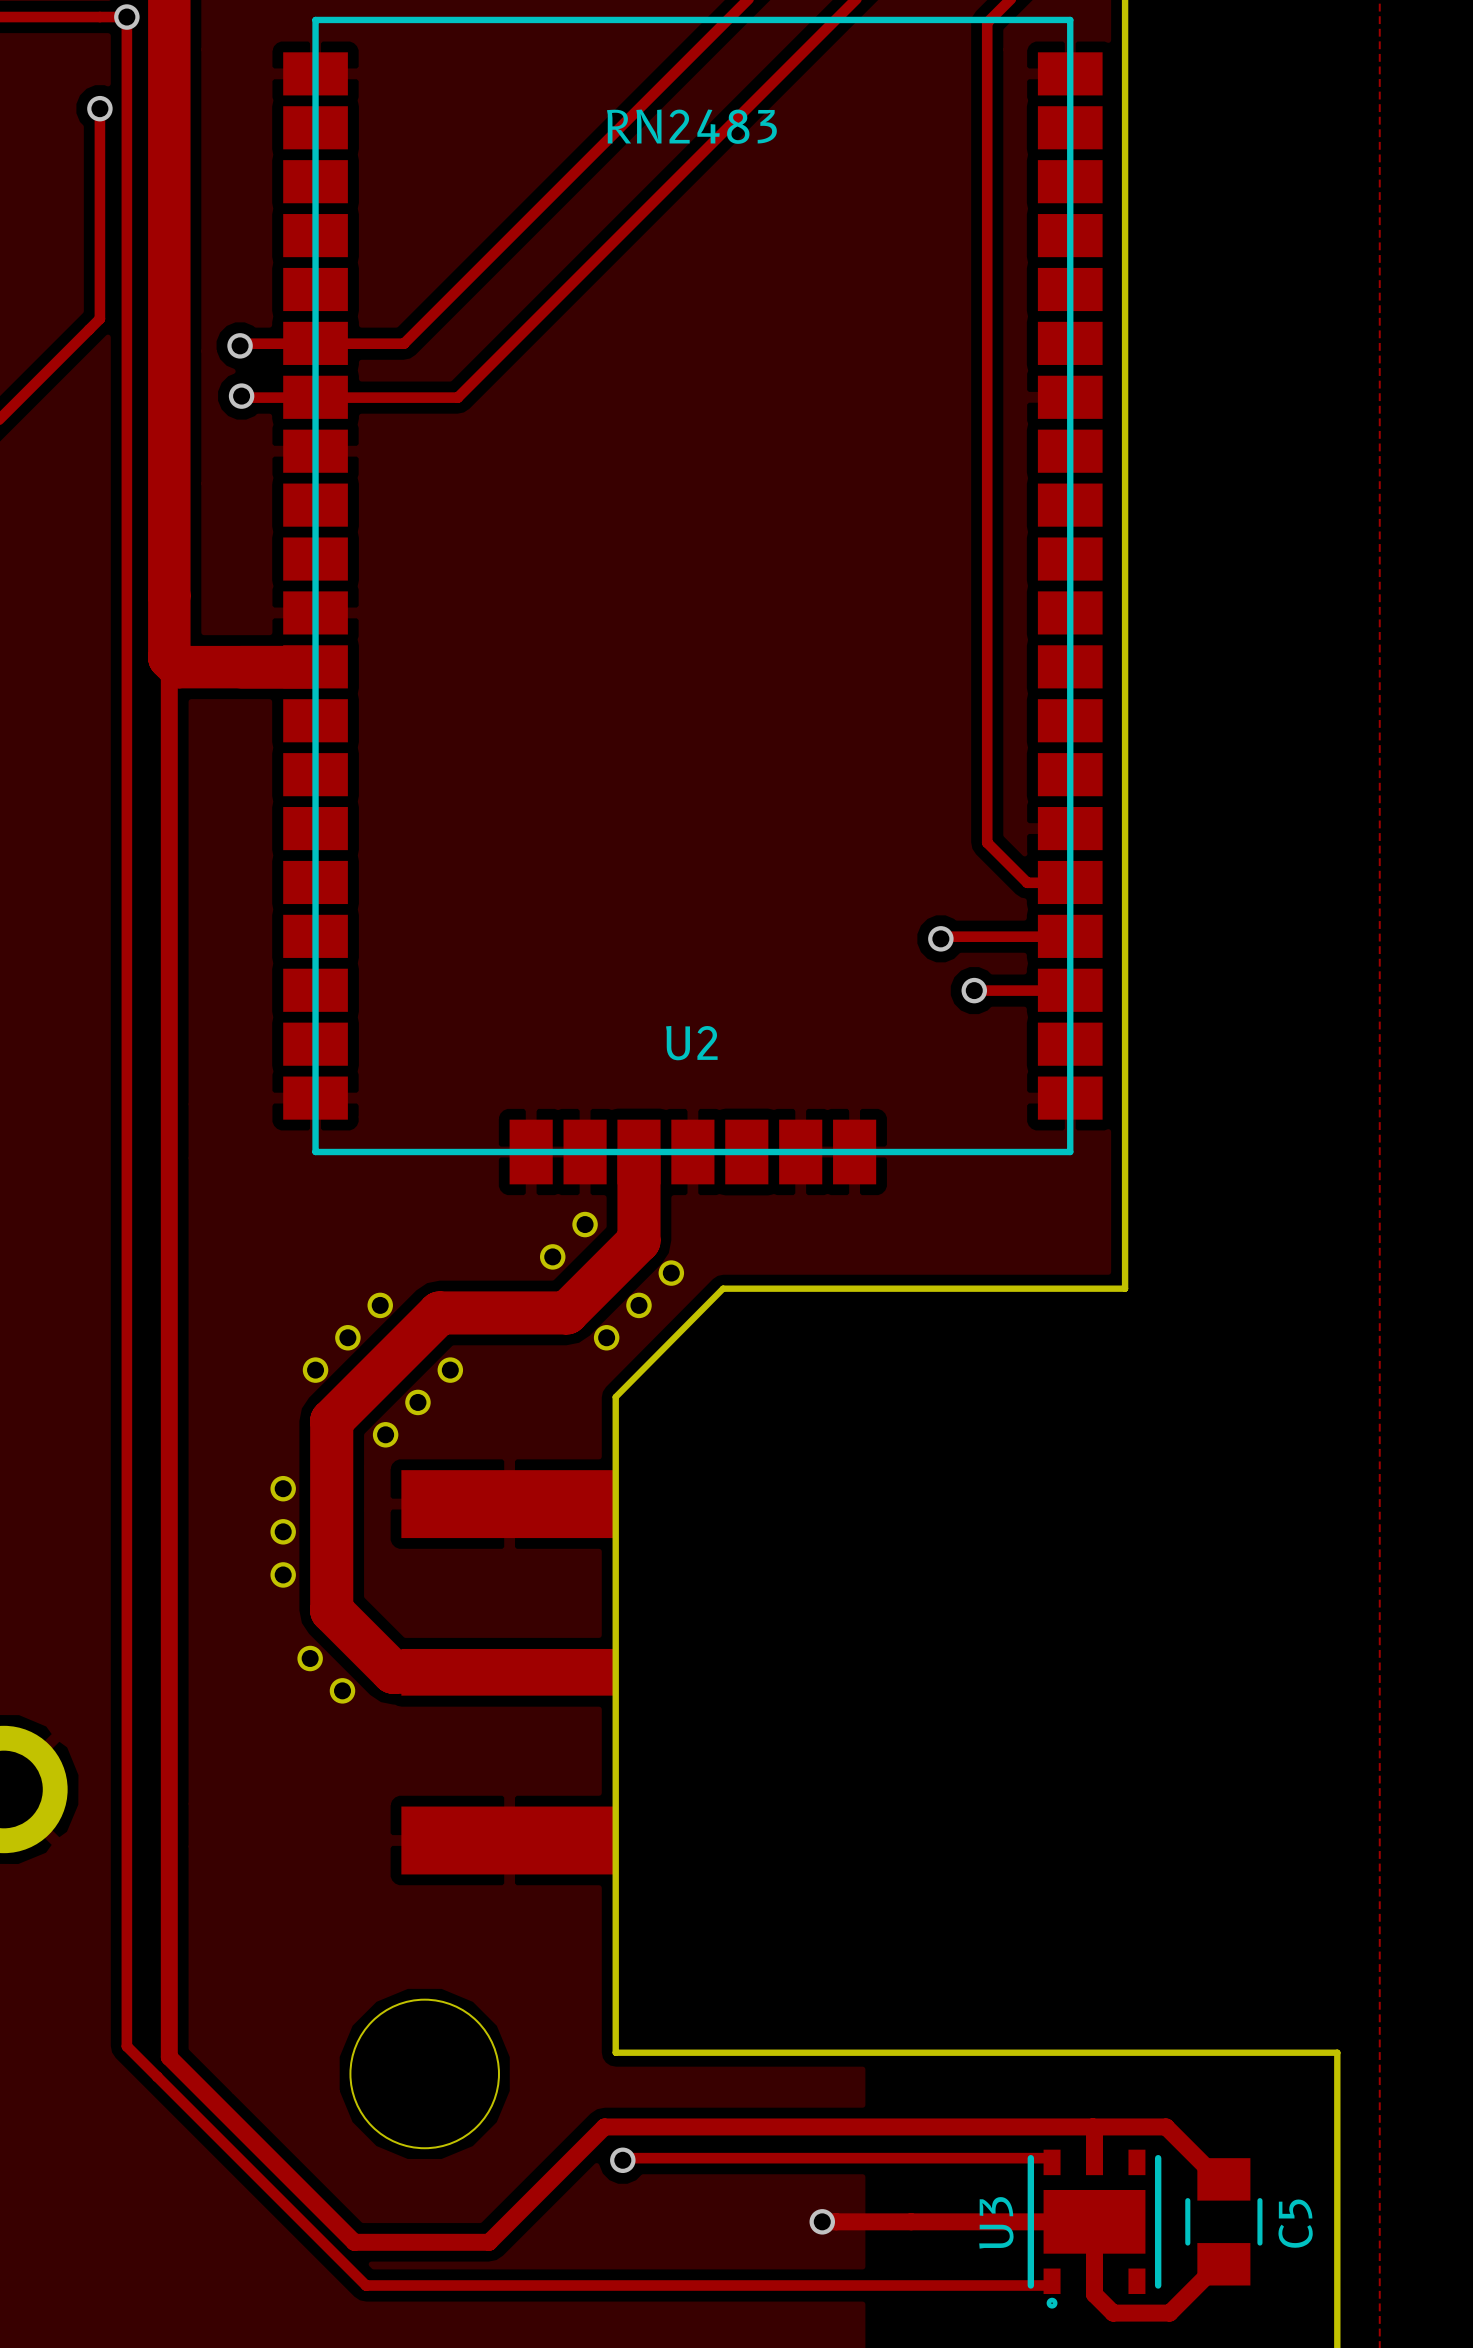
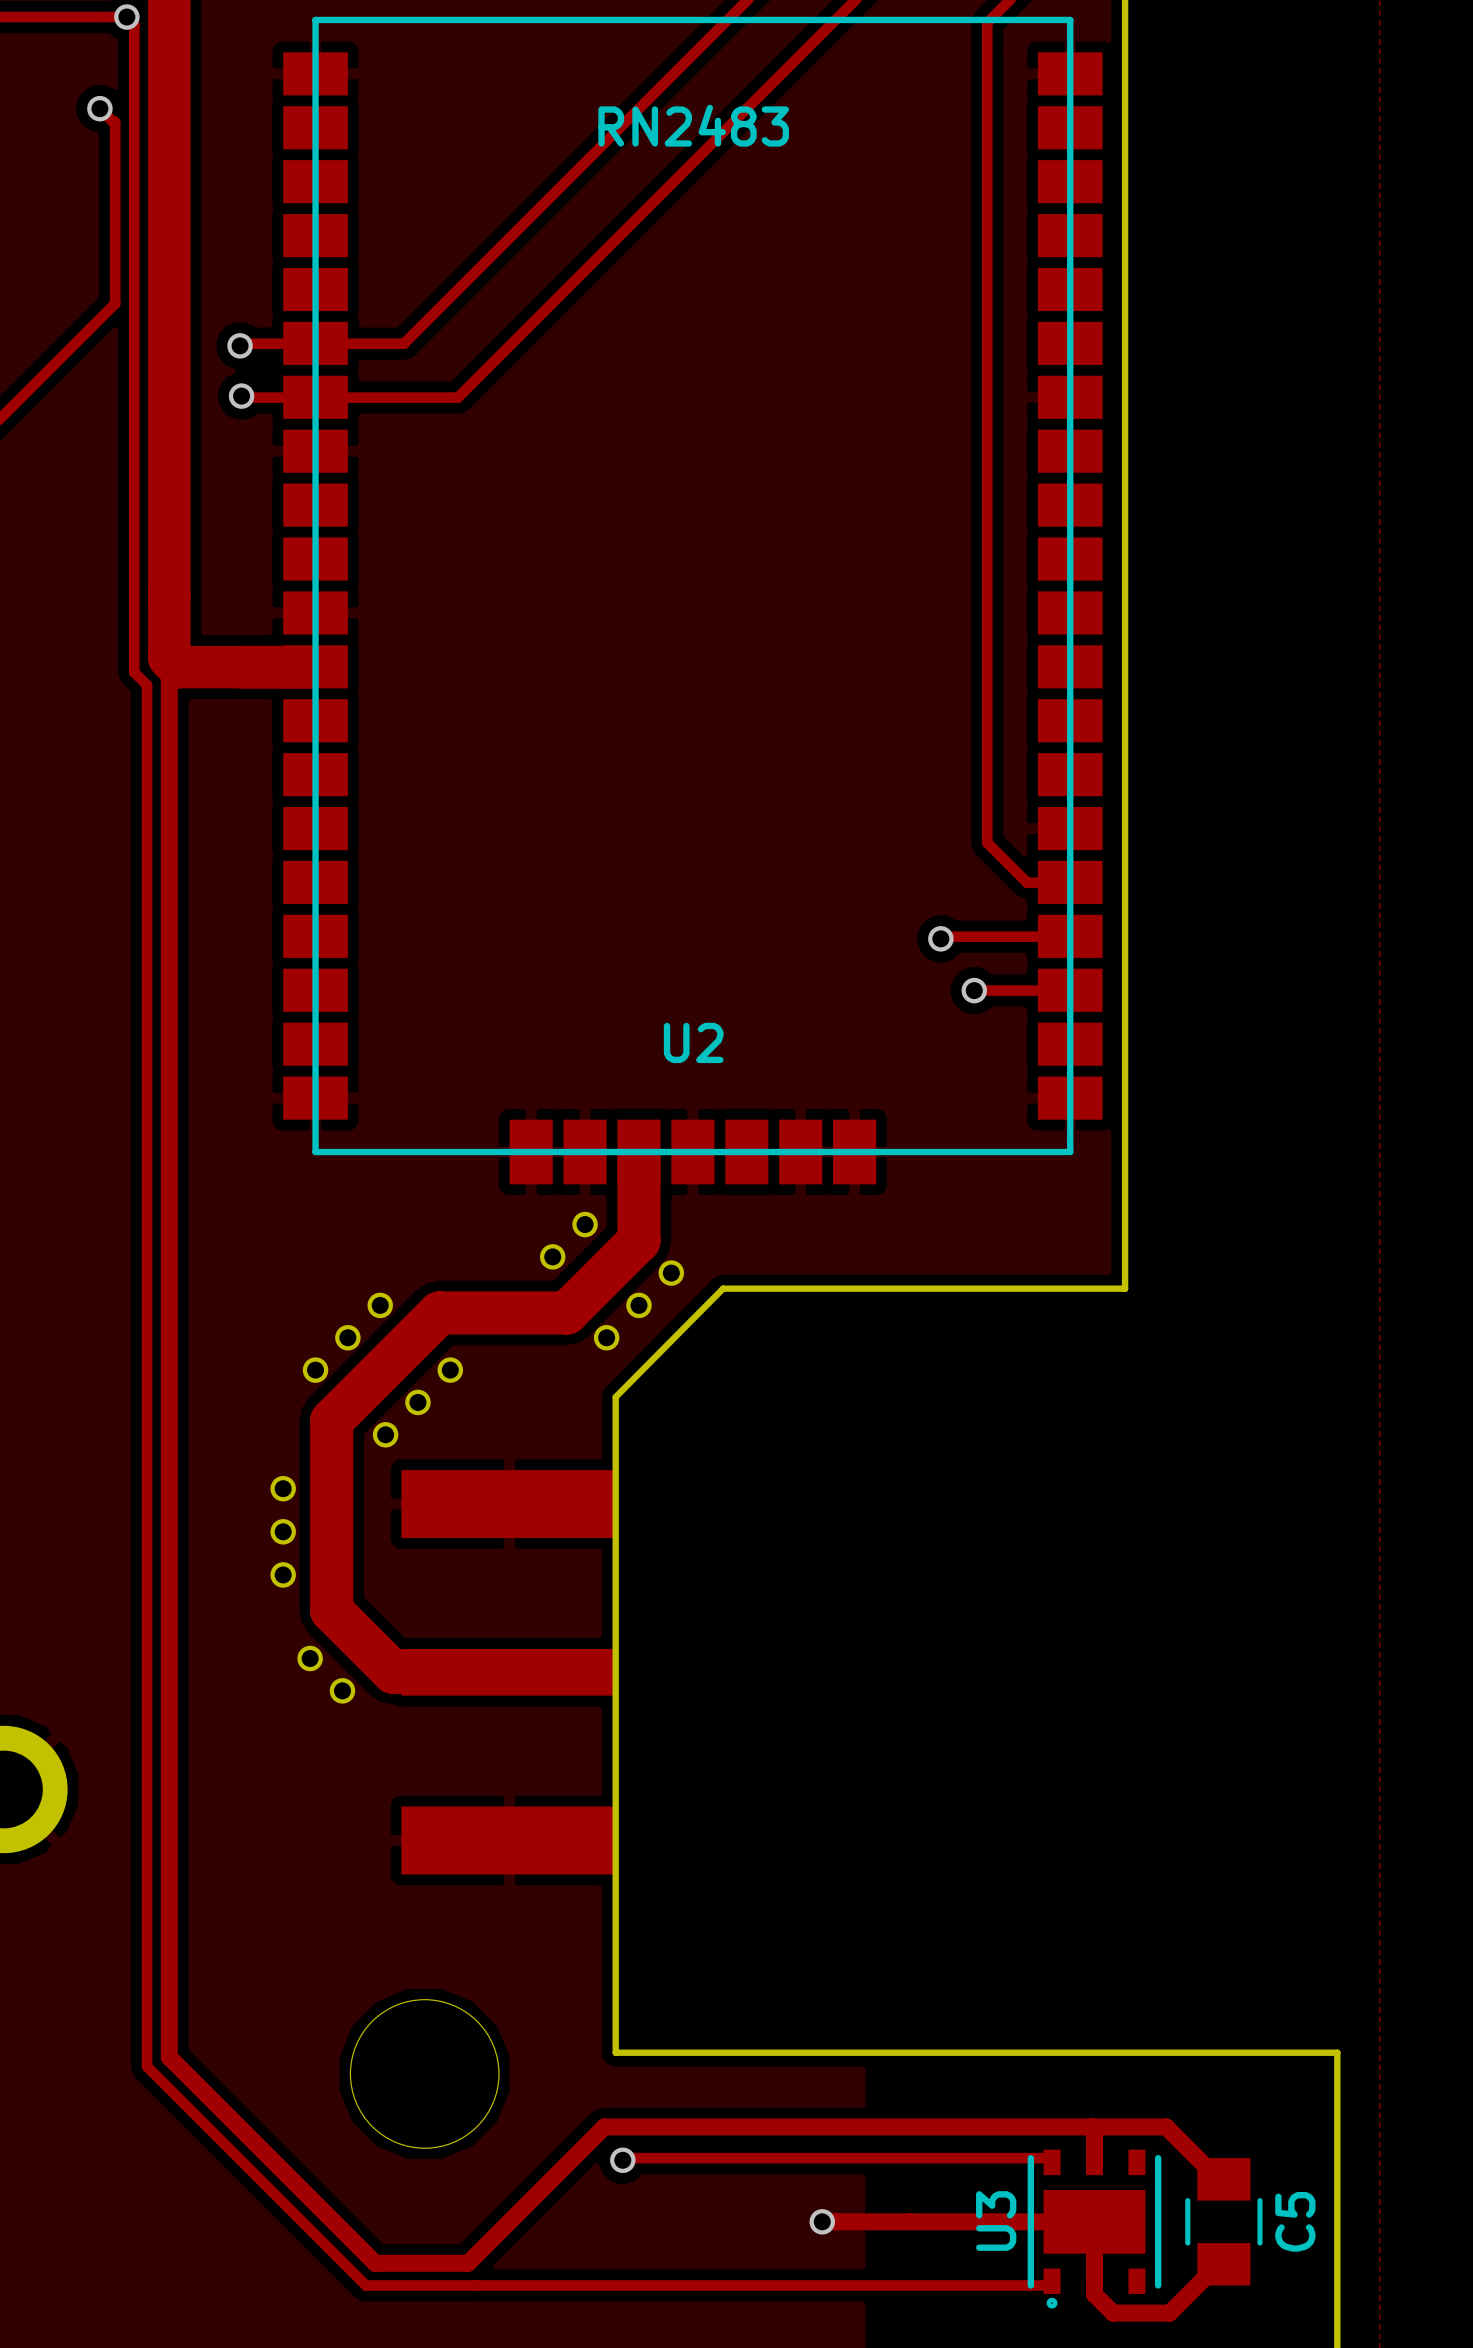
track: (126, 17) (126, 2046) (147, 2066) -> (126, 17) (134, 25) (134, 672) (147, 685) (147, 2066)
track: (99, 108) (99, 318) -> (99, 108) (115, 122) (115, 303) (99, 318)
track: (354, 2242) (489, 2242) -> (354, 2242) (375, 2263) (468, 2263) (489, 2242)

